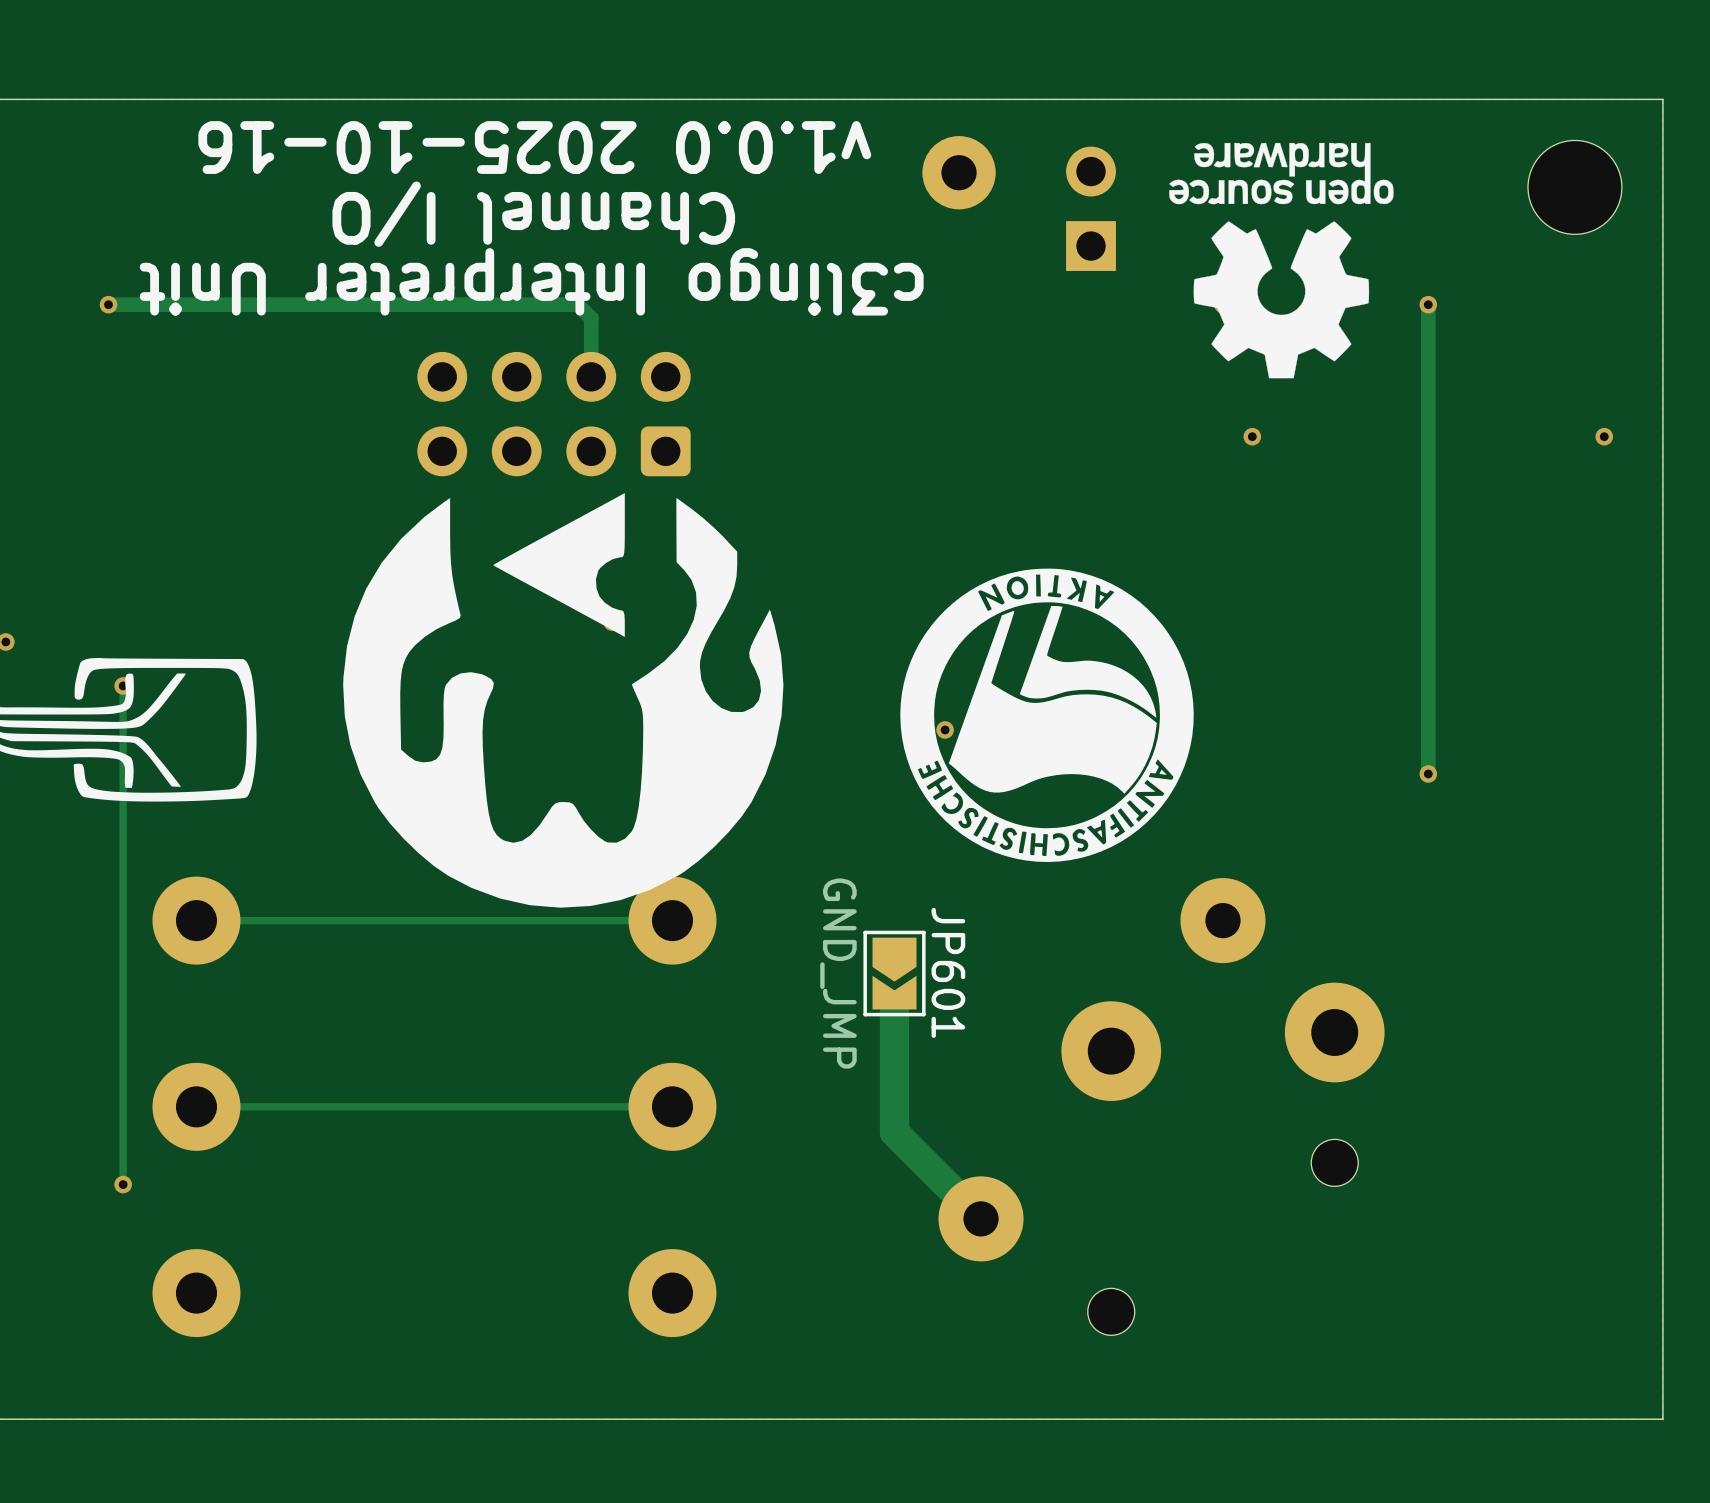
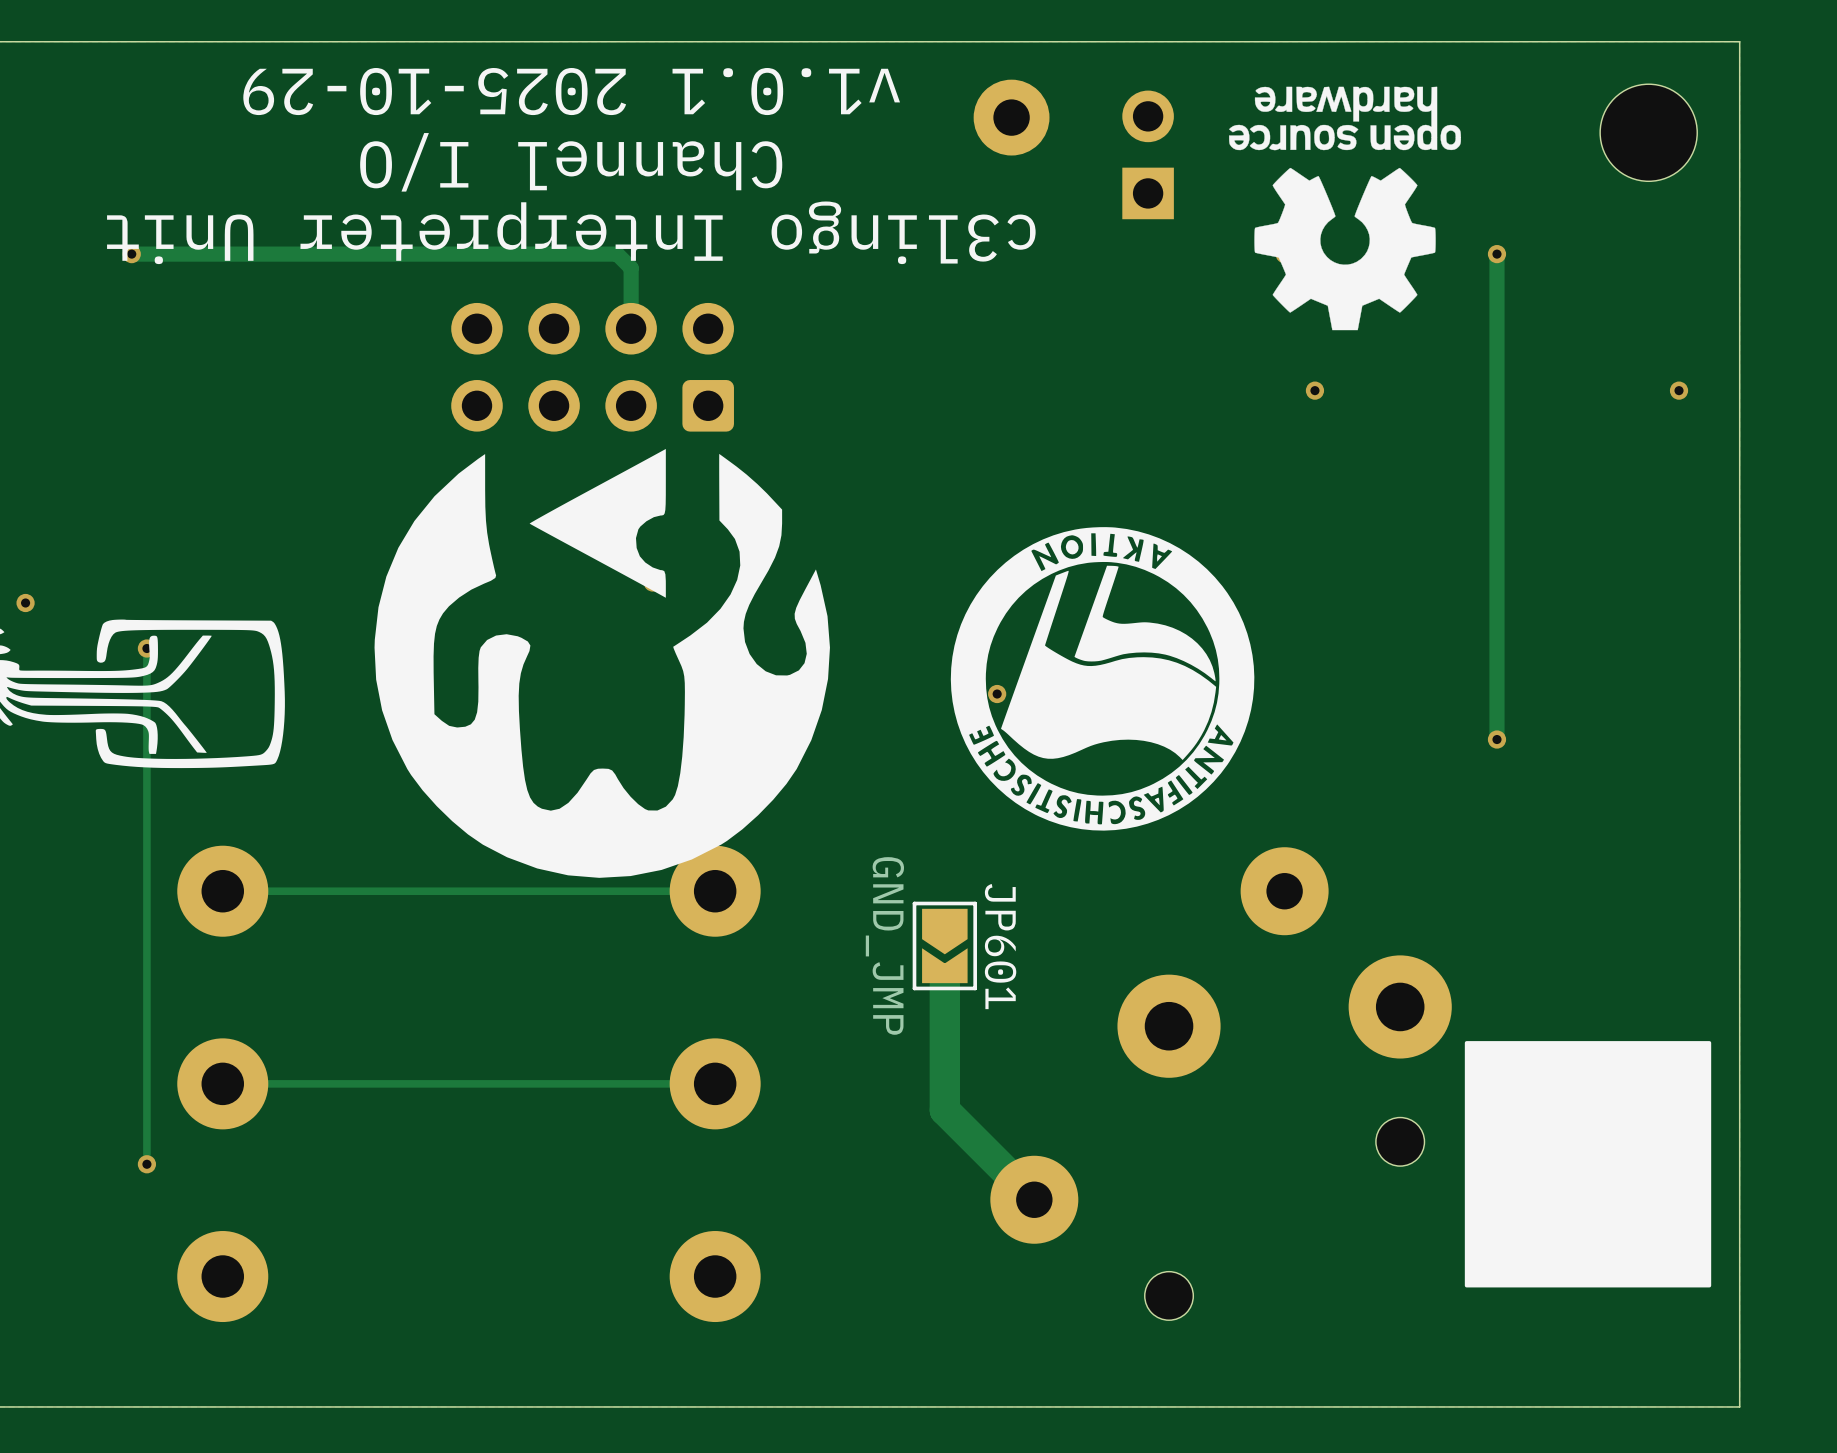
text: v1.0.0 2025-10-16 (534, 147) -> v1.0.1 2025-10-29 (571, 91)
drawing: none -> [1464, 1041, 1712, 1288]

